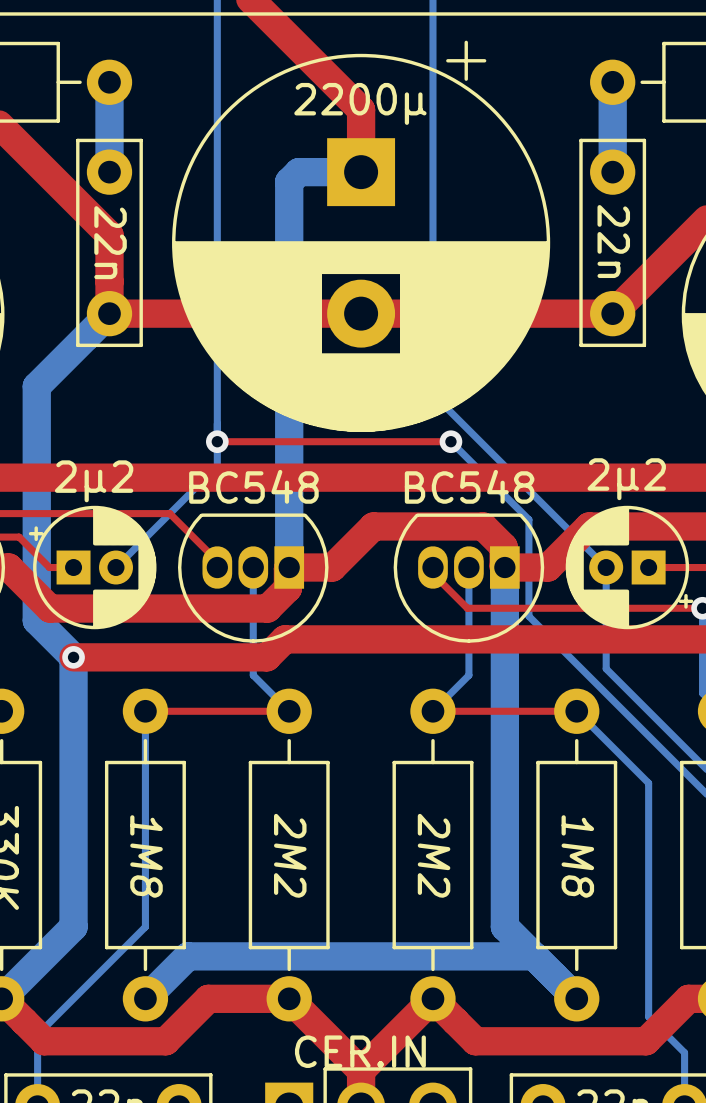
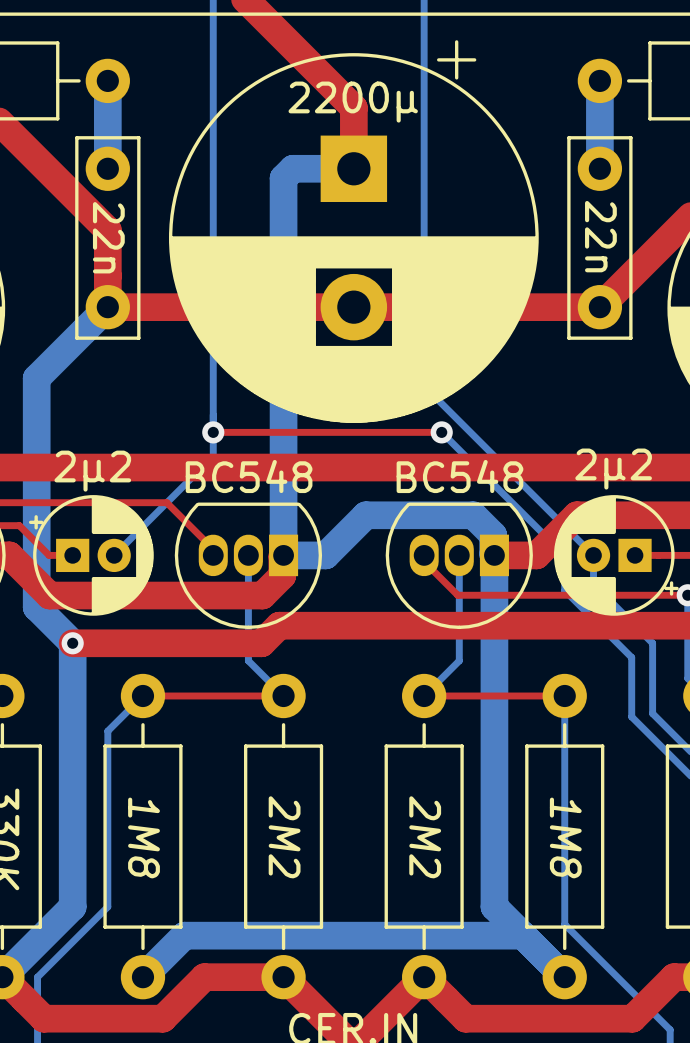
bottom track: (528, 519) (528, 616) (645, 732) -> (517, 508) (564, 555) (564, 590) (631, 657) (631, 716)
top track: (289, 567) (332, 567) (373, 526) (483, 526) (503, 546) (504, 567) -> none
bottom track: none -> (283, 555) (325, 555) (365, 515) (473, 515) (493, 535) (494, 555)
bottom track: (606, 596) (606, 668) (666, 729) -> (593, 584) (652, 643) (652, 713)
bottom track: (145, 711) (145, 926) (37, 1034) -> (142, 695) (107, 731) (107, 906) (37, 977) (37, 1012)
bottom track: (576, 711) (648, 783) (648, 1016) -> (564, 695) (564, 924) (635, 994)

